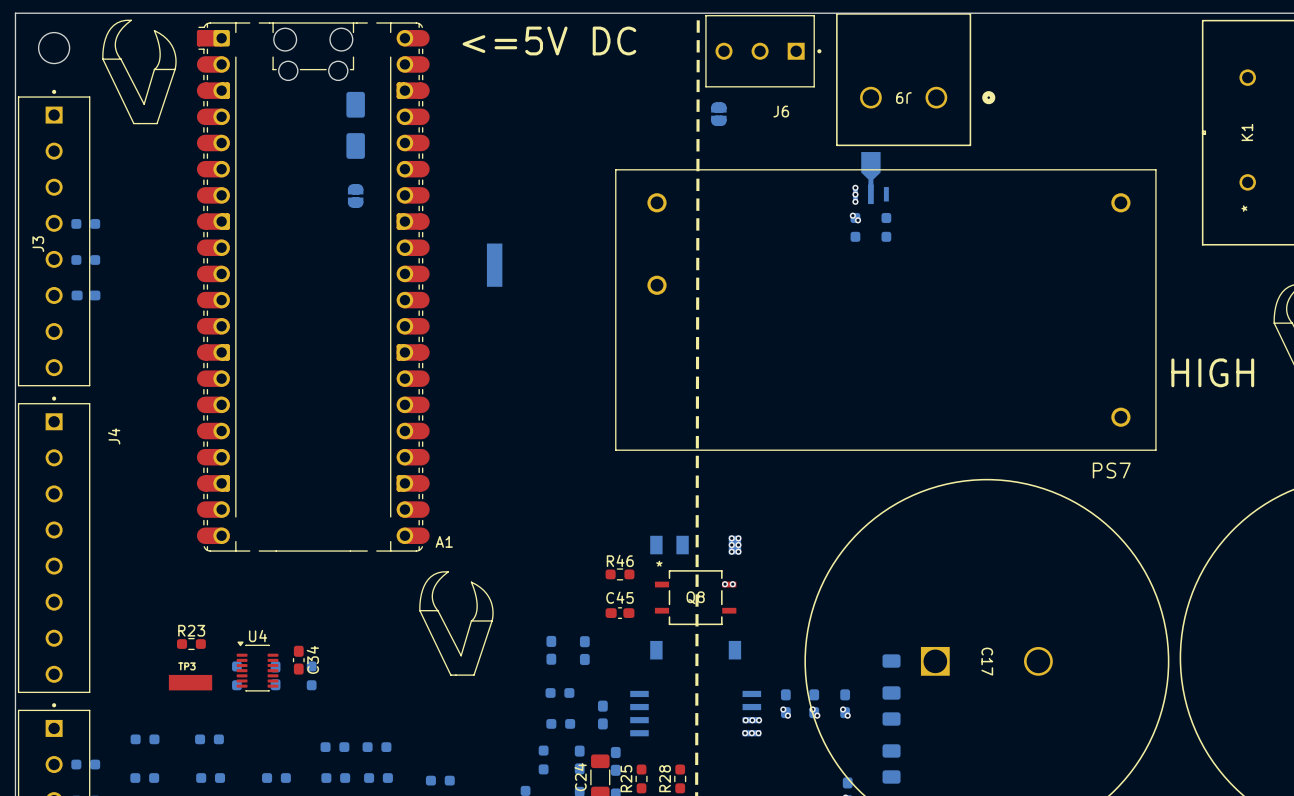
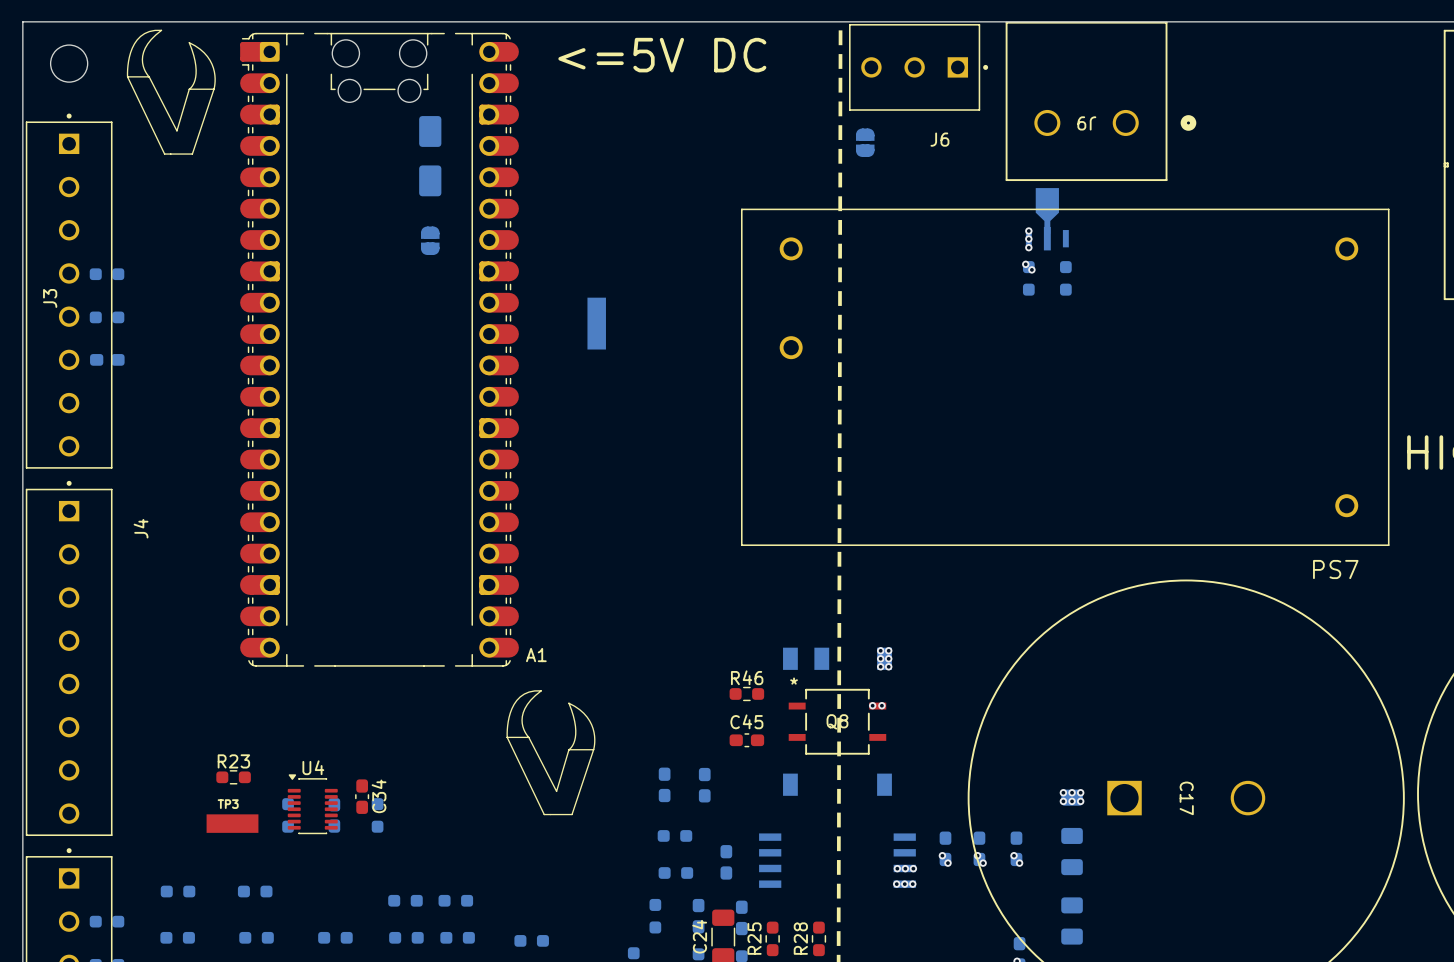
via: none -> (1063, 792)
via: none -> (1072, 792)
via: none -> (1080, 792)
via: none -> (1063, 801)
via: none -> (1072, 801)
via: none -> (1080, 801)

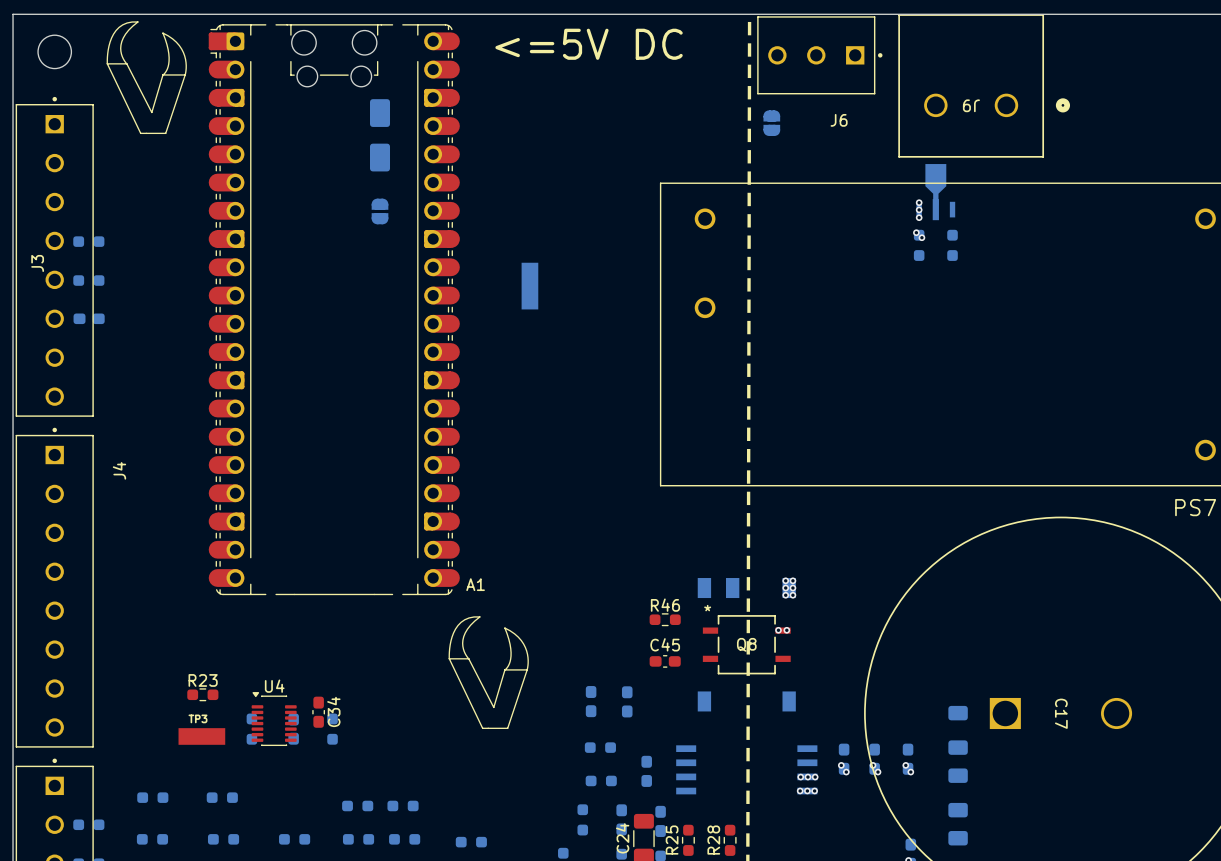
via: (1063, 792) -> none
via: (1072, 792) -> none
via: (1080, 792) -> none
via: (1063, 801) -> none
via: (1072, 801) -> none
via: (1080, 801) -> none

